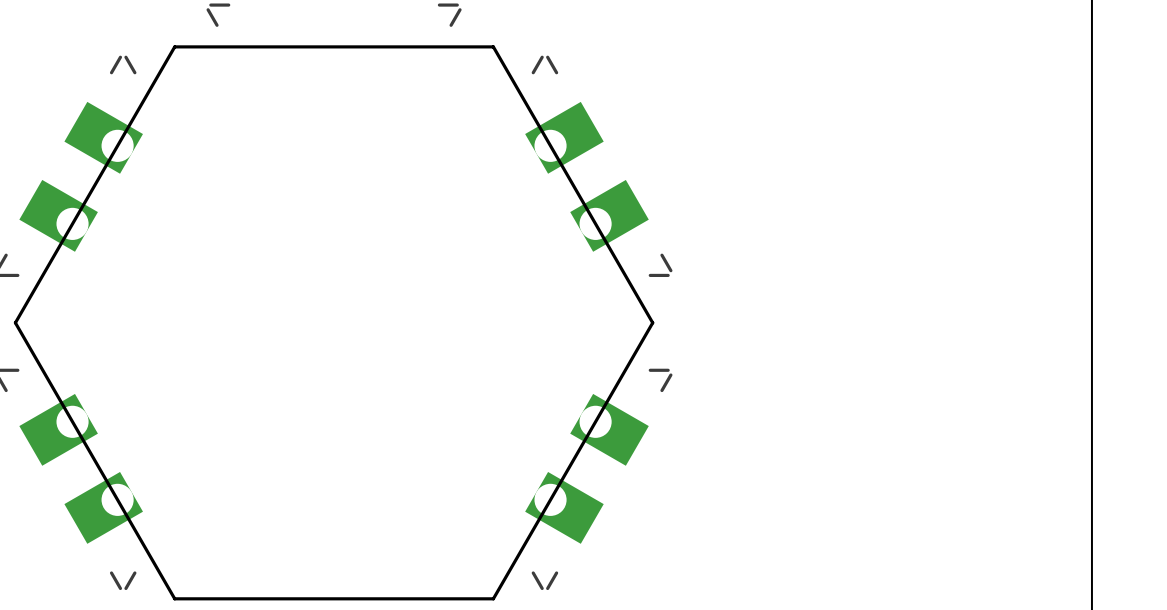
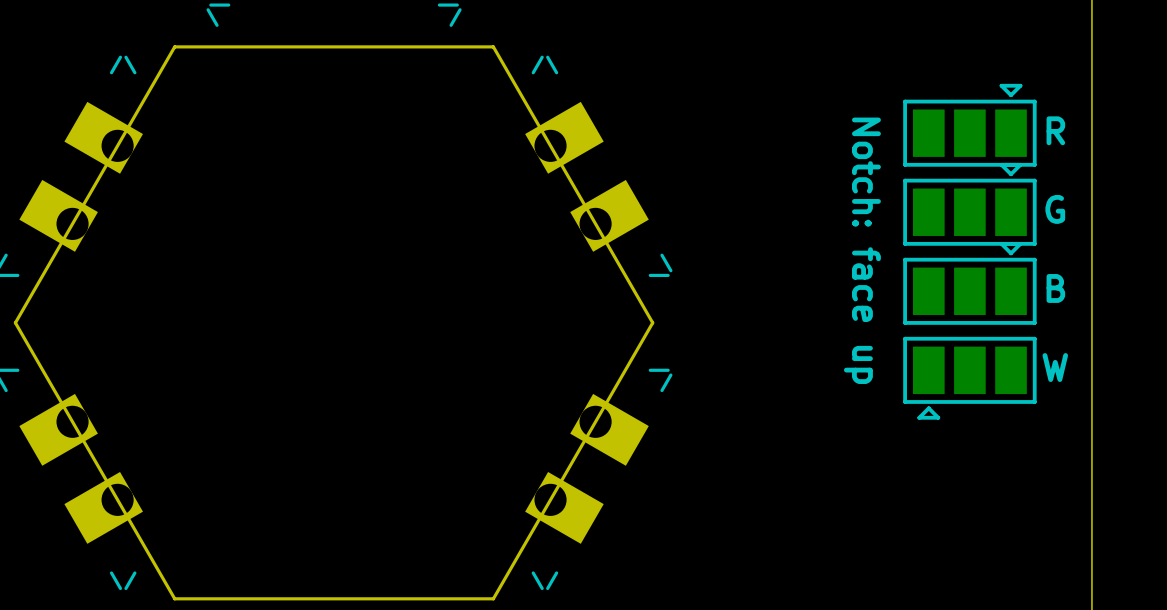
part: none -> (969, 125)
text: none -> R (1055, 130)
part: none -> (969, 204)
text: none -> G (1055, 209)
text: none -> Notch: face up (862, 250)
part: none -> (969, 283)
text: none -> B (1055, 288)
text: none -> W (1055, 367)
part: none -> (969, 378)

